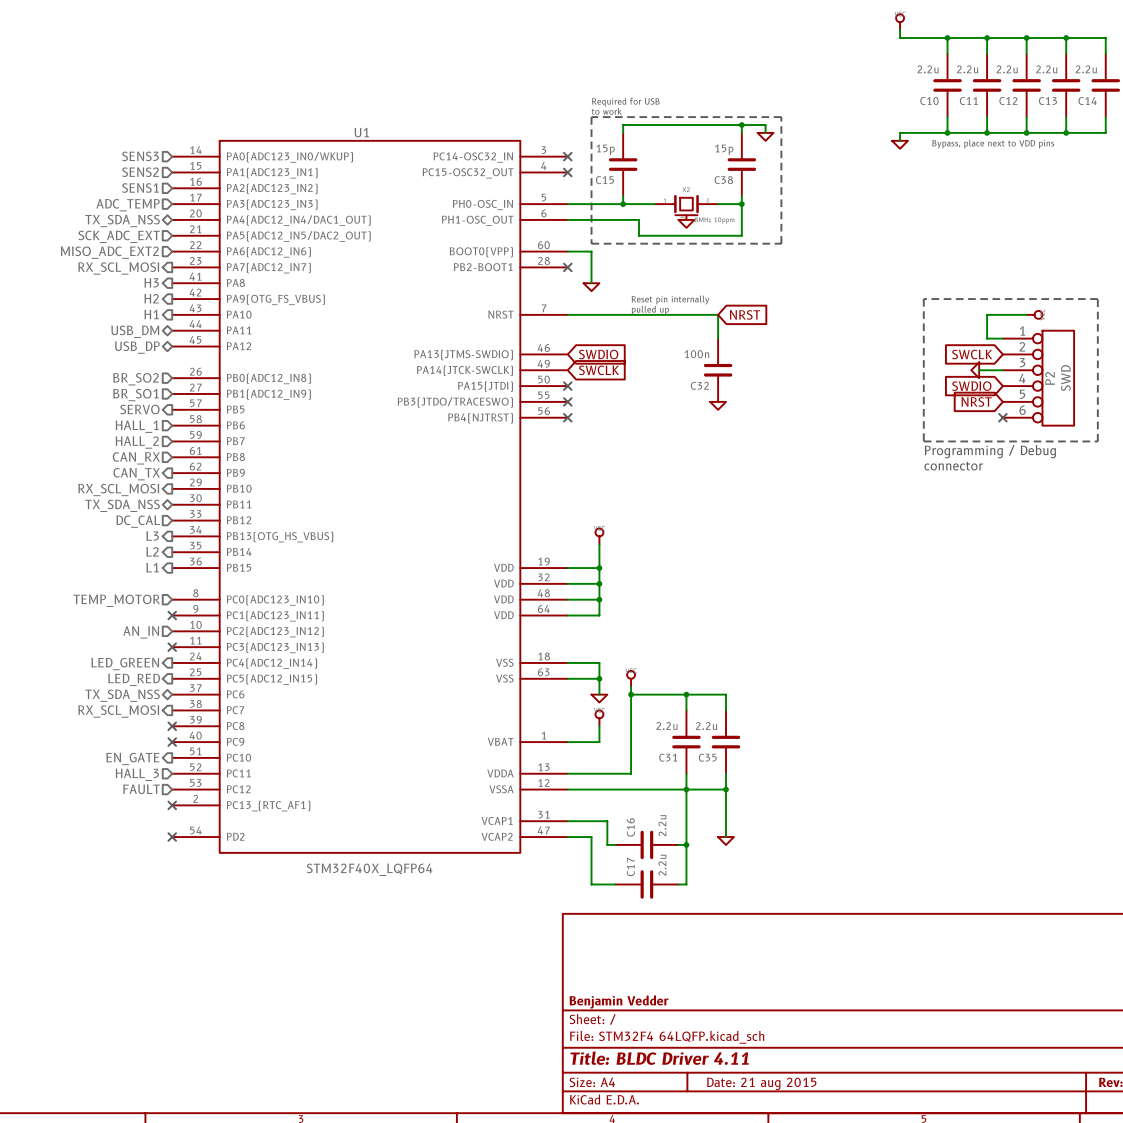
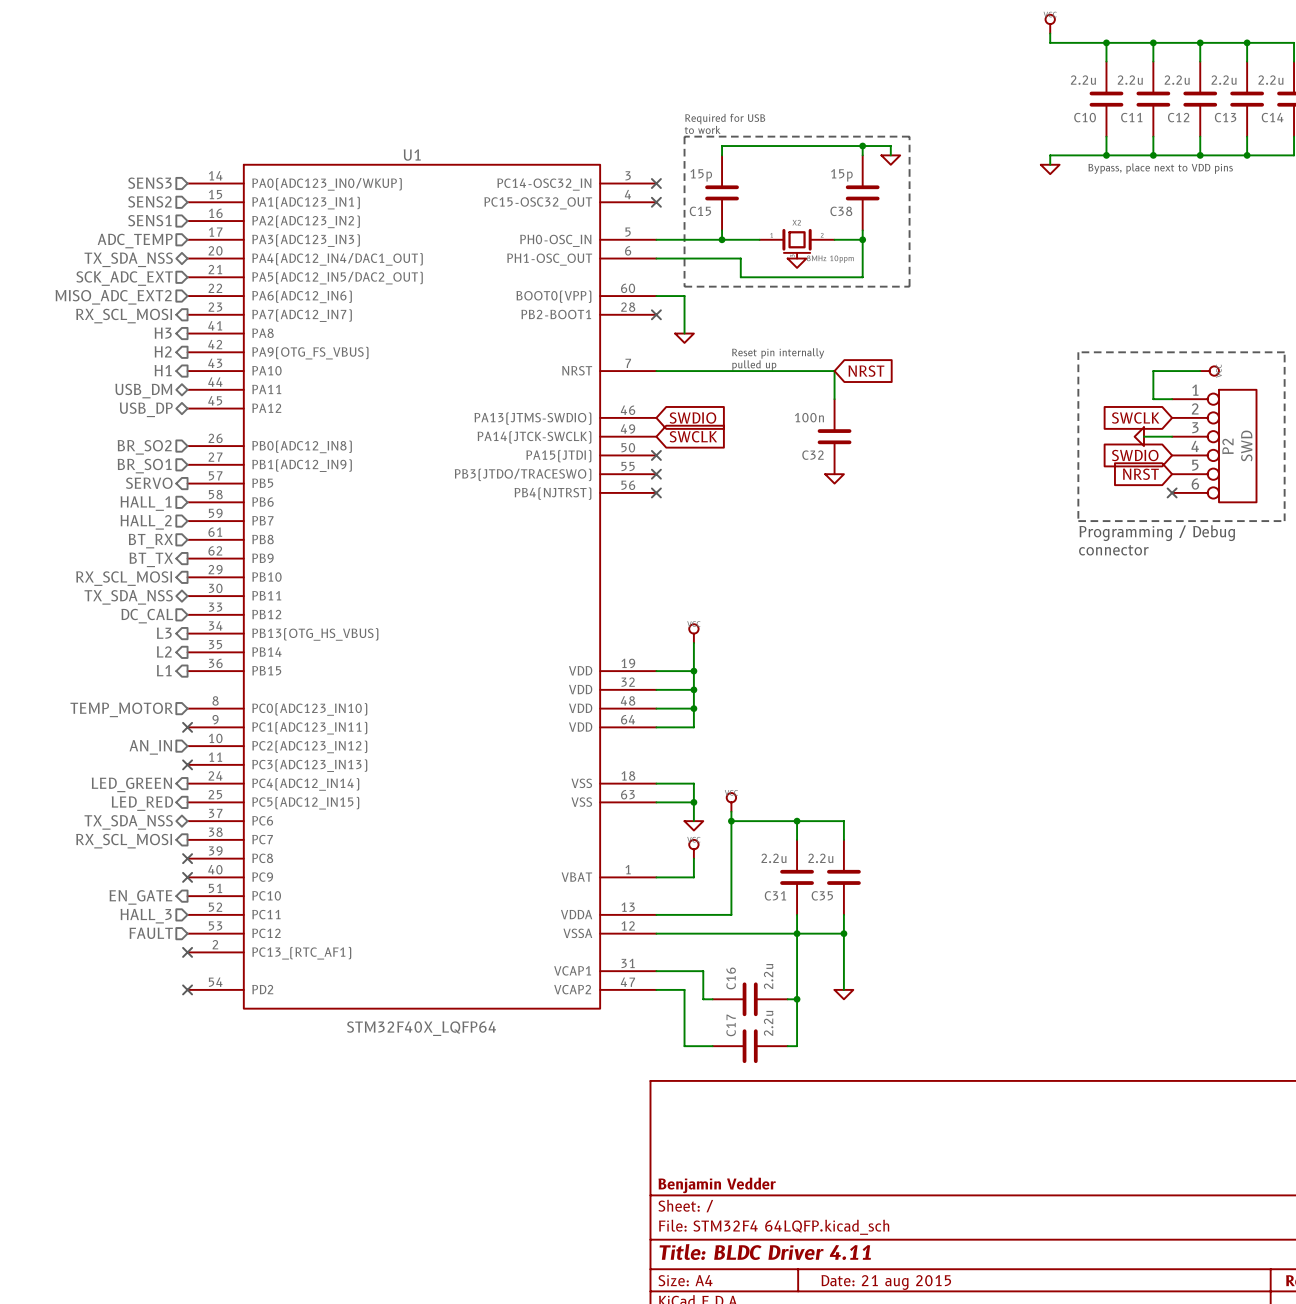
hierarchical label: CAN_RX (136, 458) -> BT_RX (150, 541)
hierarchical label: CAN_TX (136, 474) -> BT_TX (151, 559)

